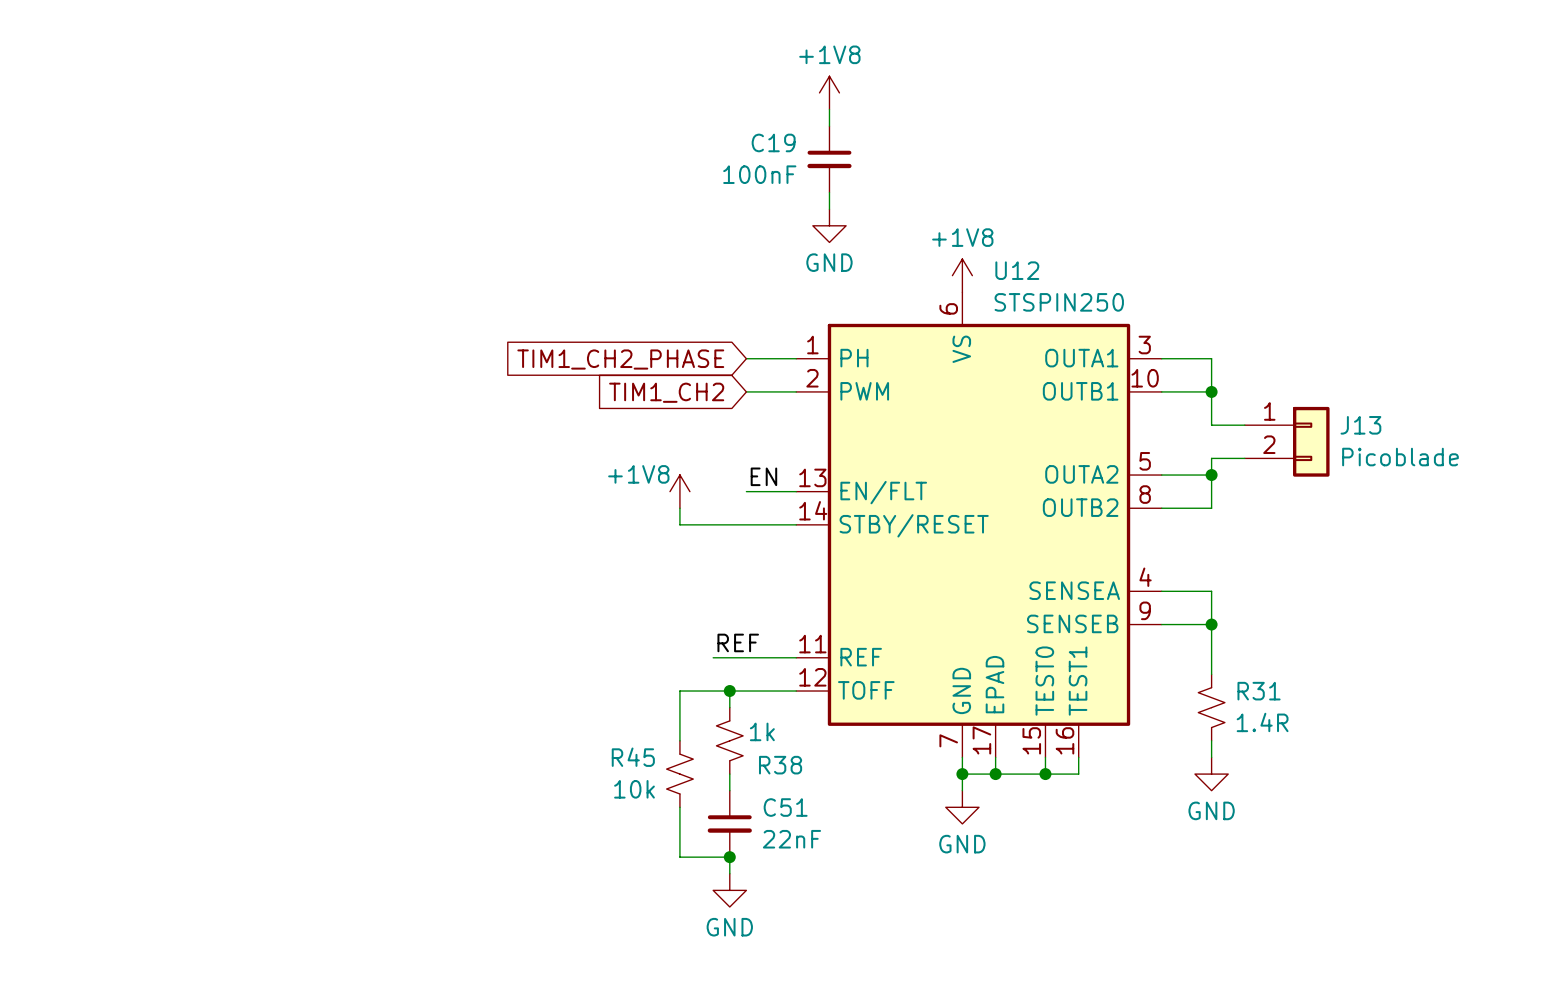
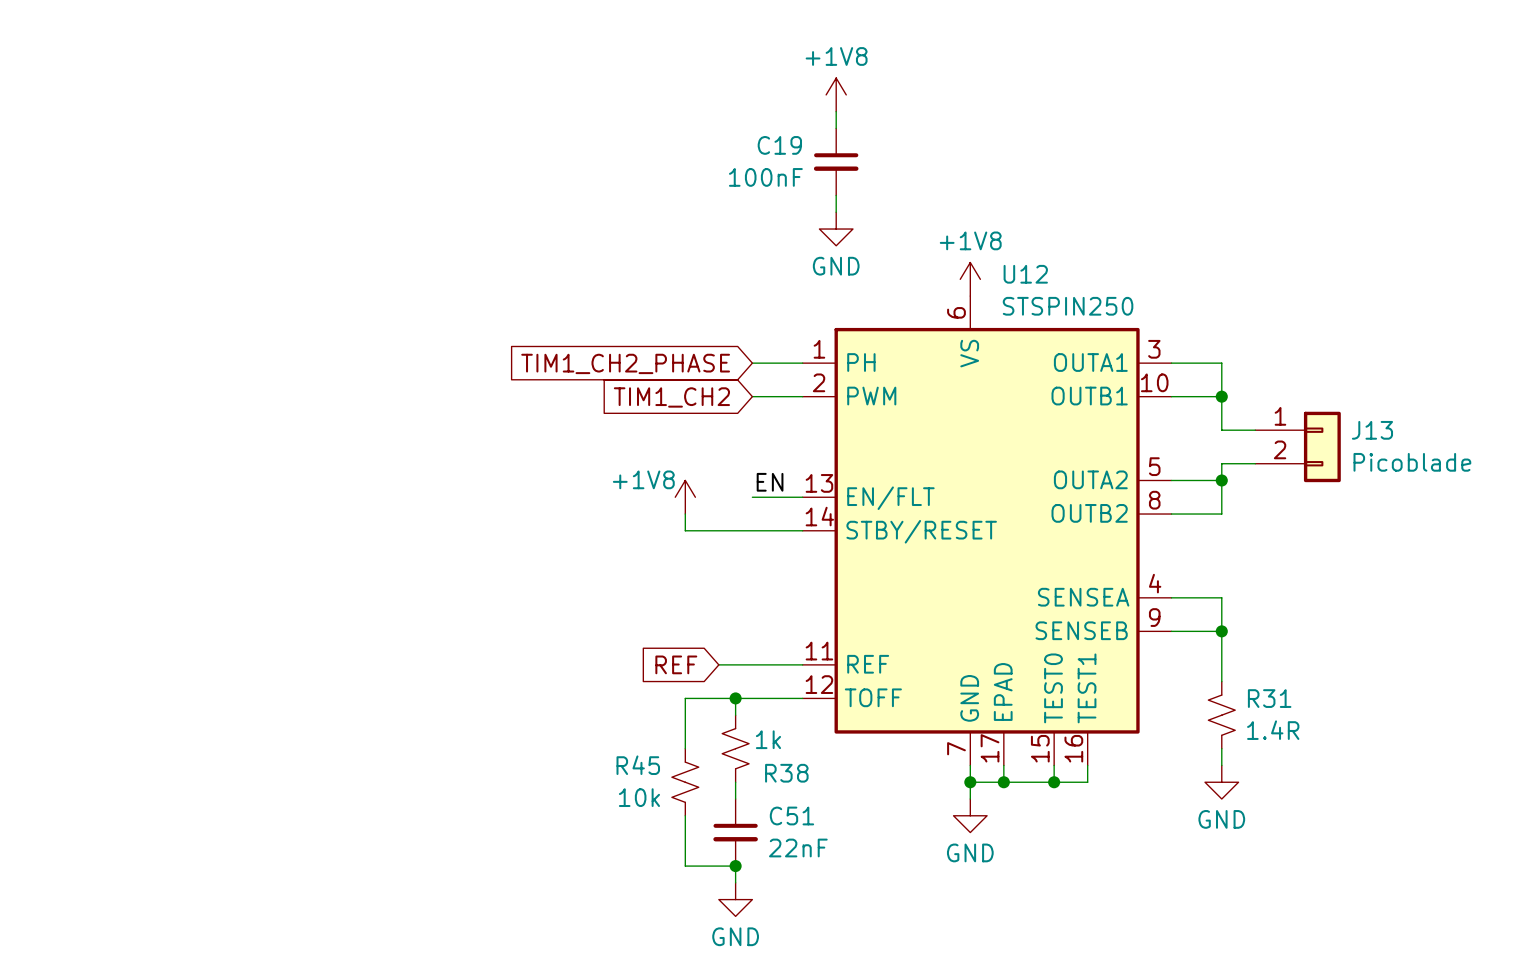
label: REF (738, 642) -> none
global label: none -> REF (676, 664)

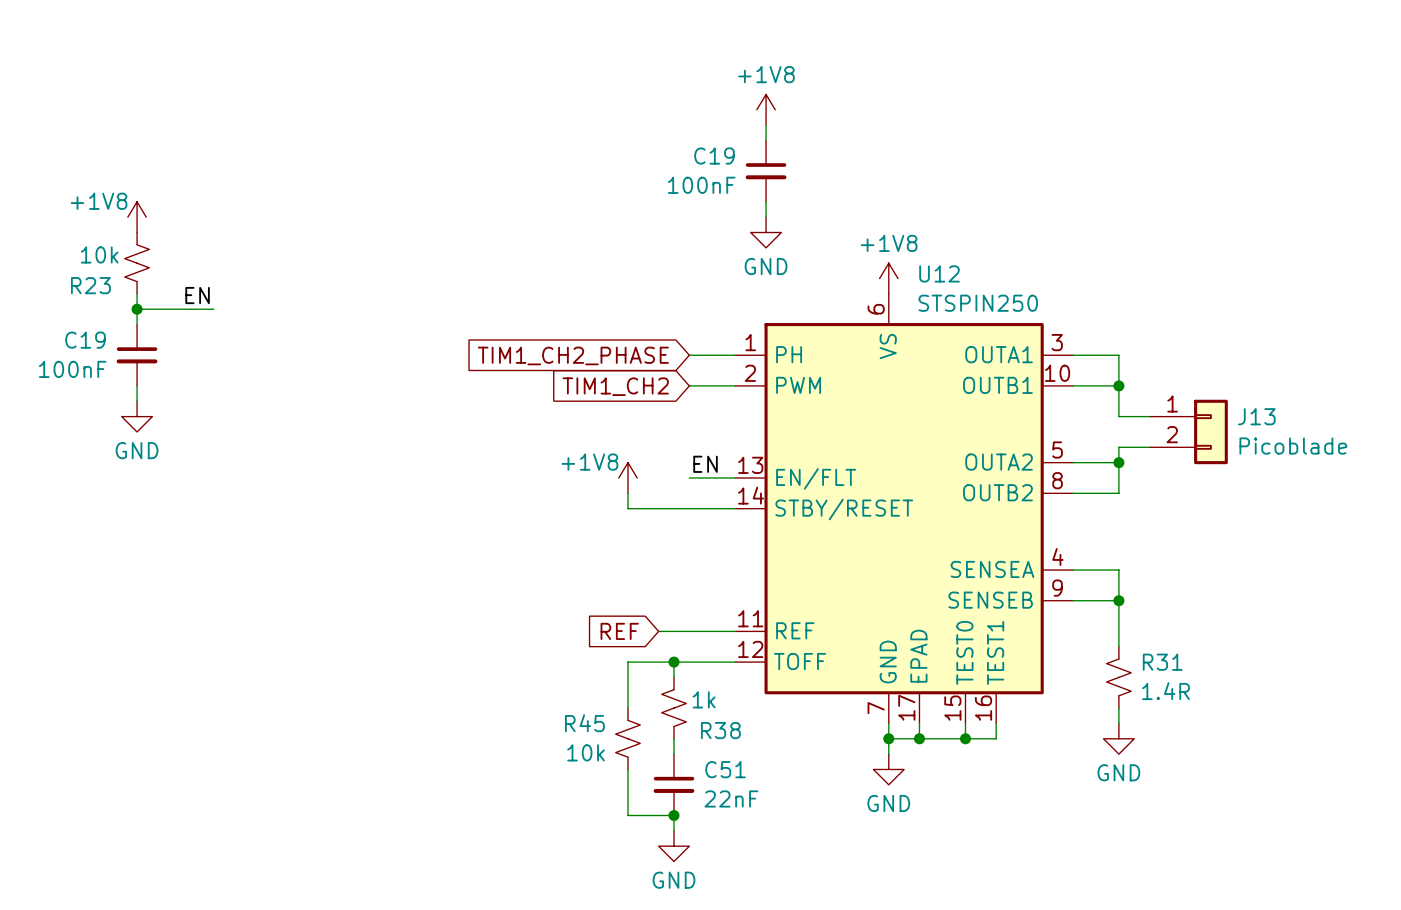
power symbol: none -> +1V8 (137, 217)
R23: none -> 10k (137, 263)
wire: none -> (137, 293) (137, 324)
label: none -> EN (197, 295)
wire: none -> (137, 309) (213, 309)
junction: none -> (137, 309)
C19: none -> 100nF (137, 355)
wire: none -> (137, 385) (137, 401)
power symbol: none -> GND (137, 416)

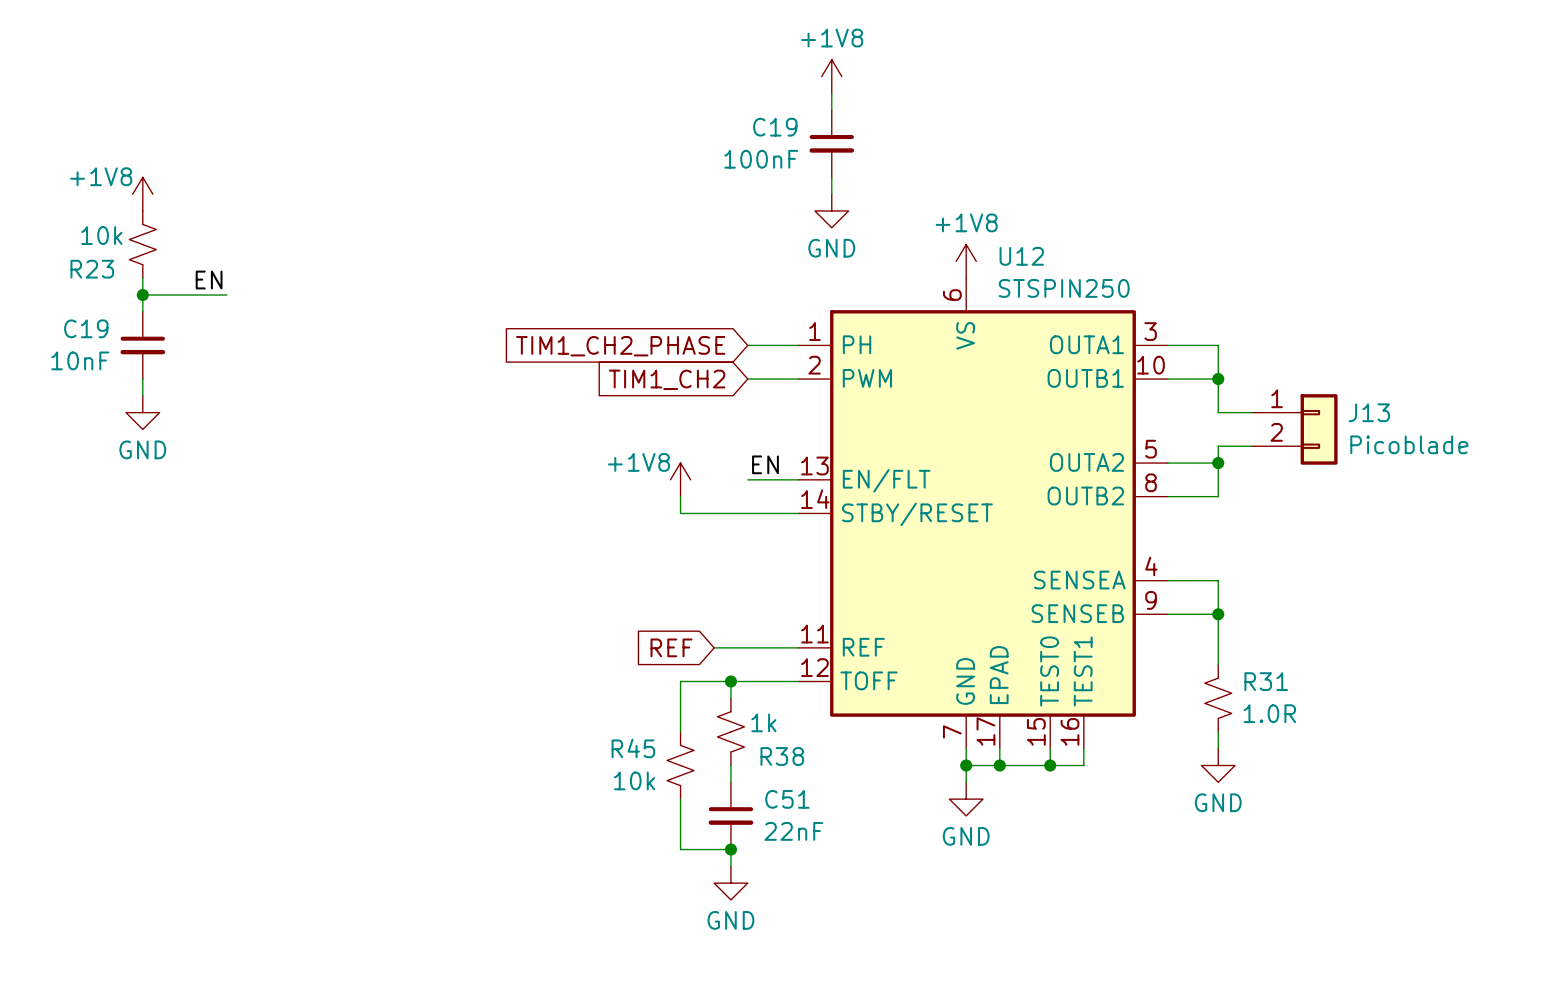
C19 value: 100nF (72, 369) -> 10nF (80, 360)
R31 value: 1.4R (1165, 691) -> 1.0R (1269, 713)

